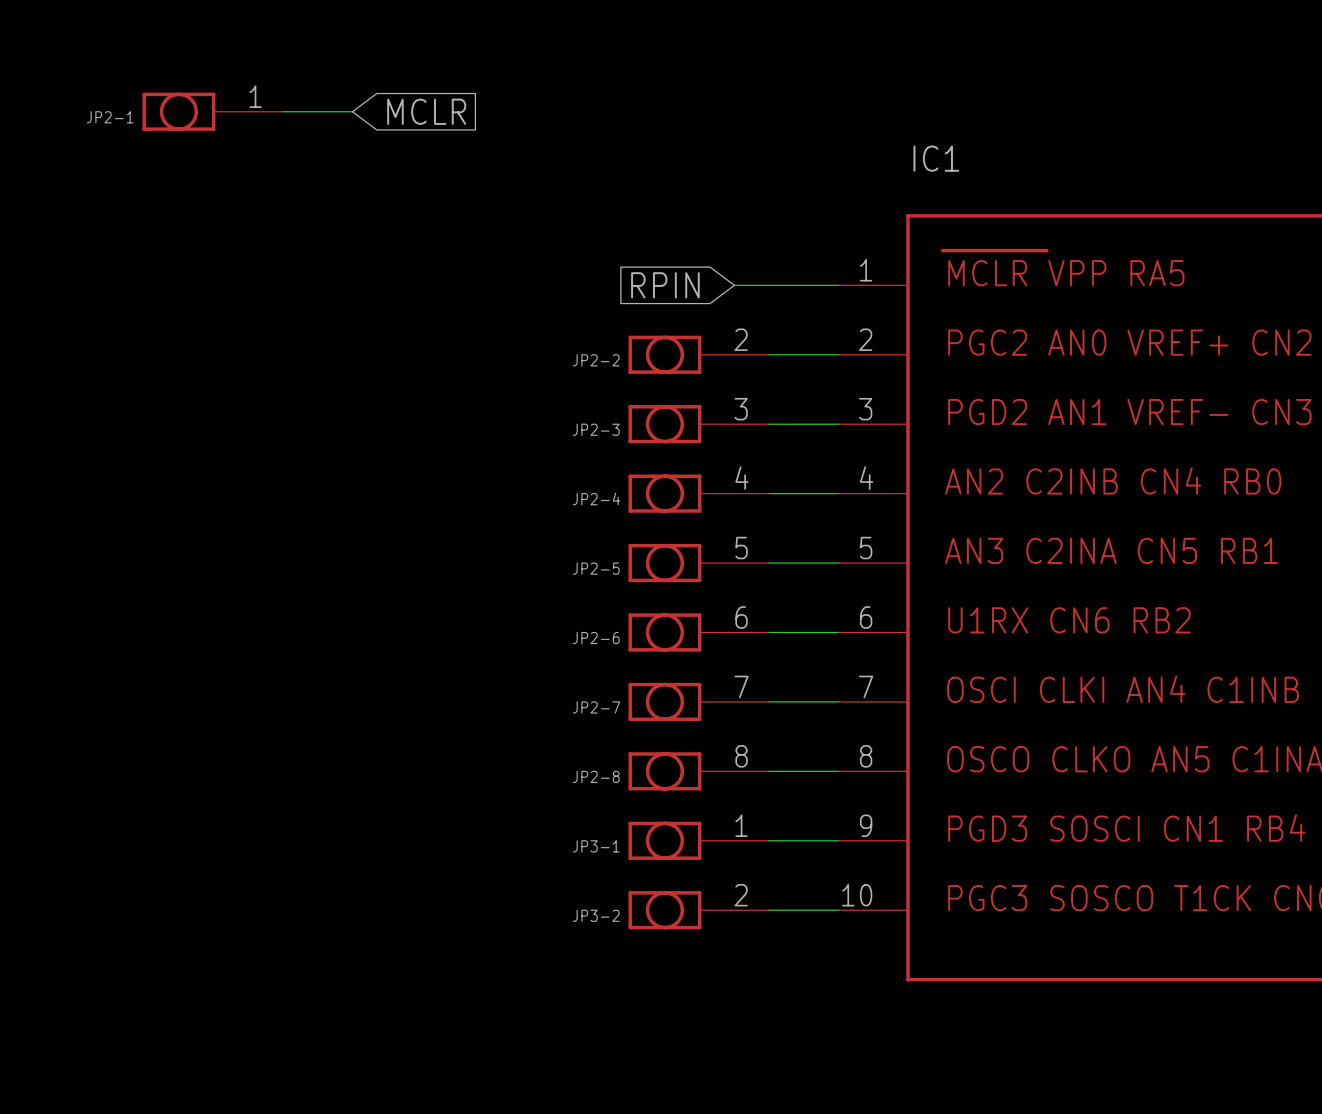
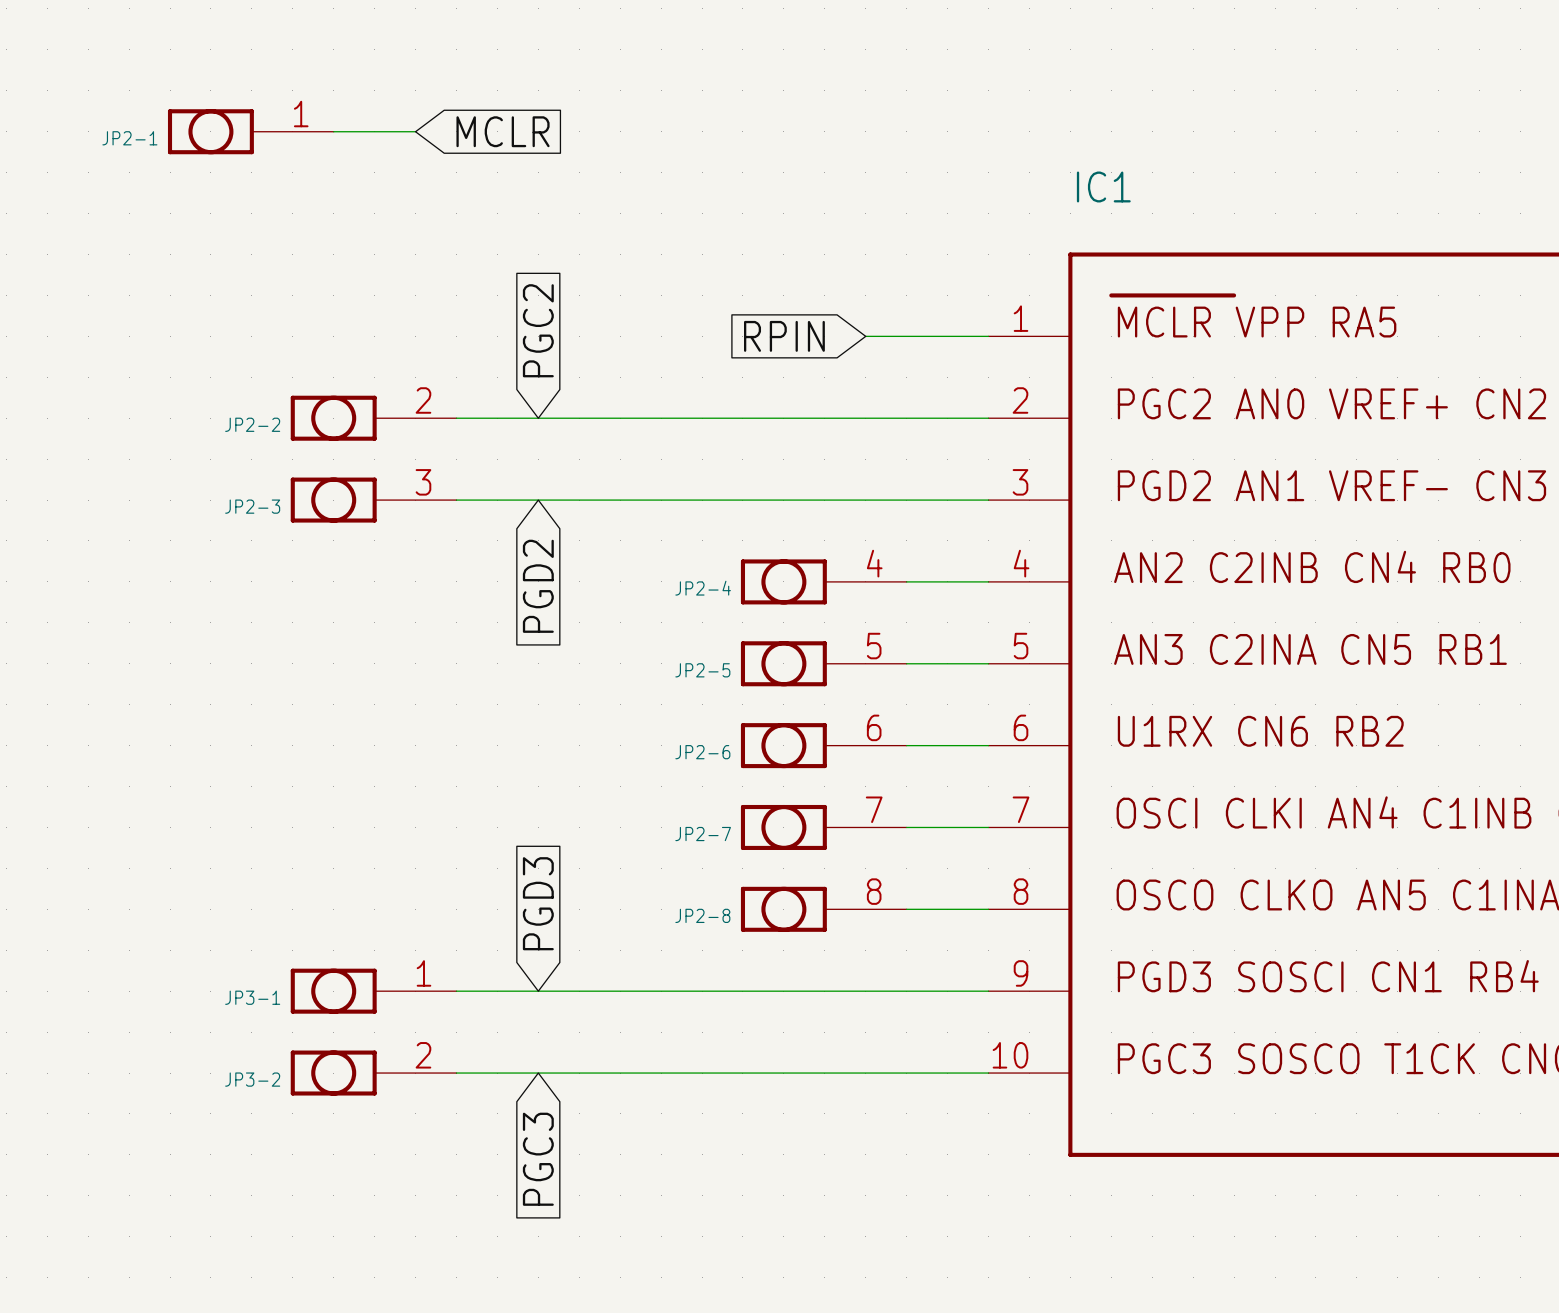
global label: none -> PGC2 (538, 330)
wire: none -> (456, 418) (906, 418)
JP2-2 position: (698, 354) -> (373, 418)
wire: none -> (456, 500) (906, 500)
JP2-3 position: (698, 424) -> (373, 500)
global label: none -> PGD2 (538, 586)
global label: none -> PGD3 (538, 903)
wire: none -> (456, 991) (906, 991)
JP3-1 position: (698, 840) -> (373, 991)
wire: none -> (456, 1073) (906, 1073)
JP3-2 position: (698, 910) -> (373, 1073)
global label: none -> PGC3 (538, 1159)

